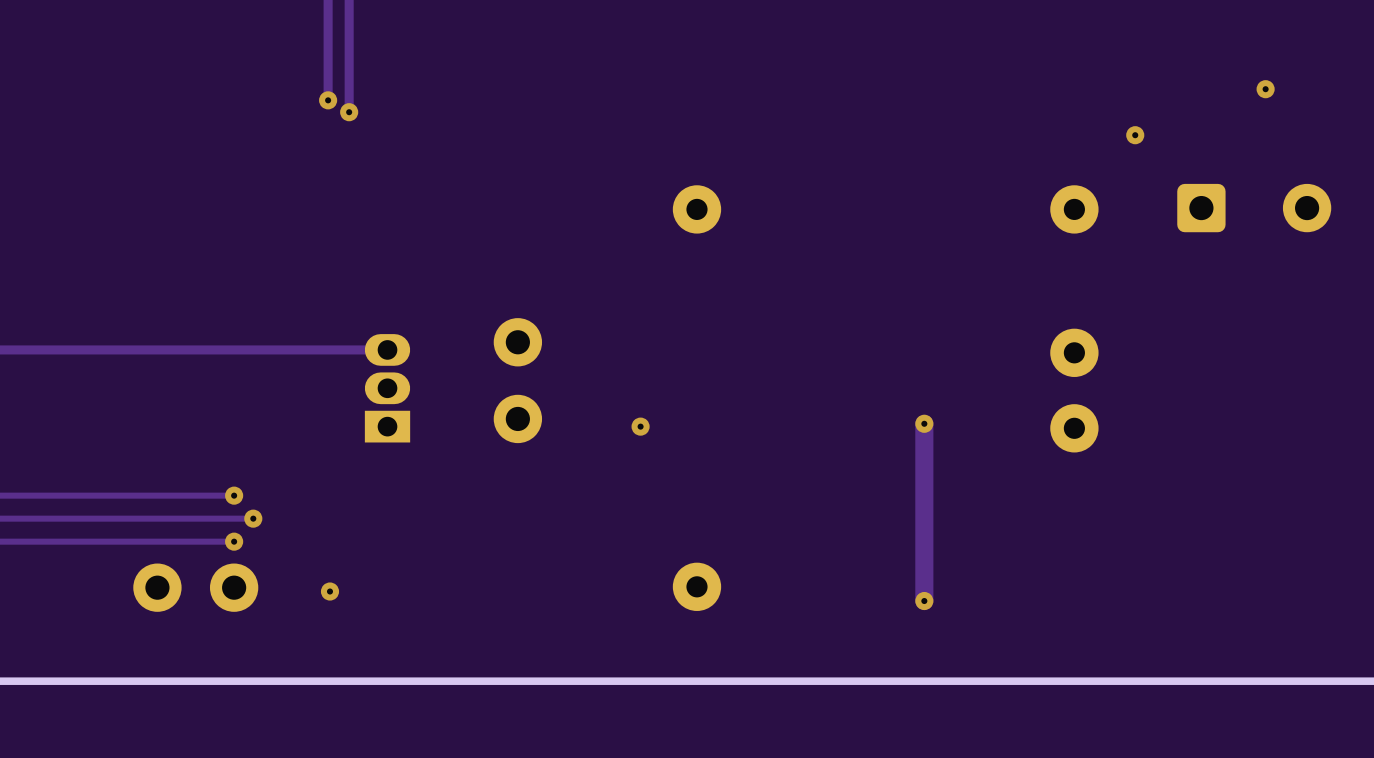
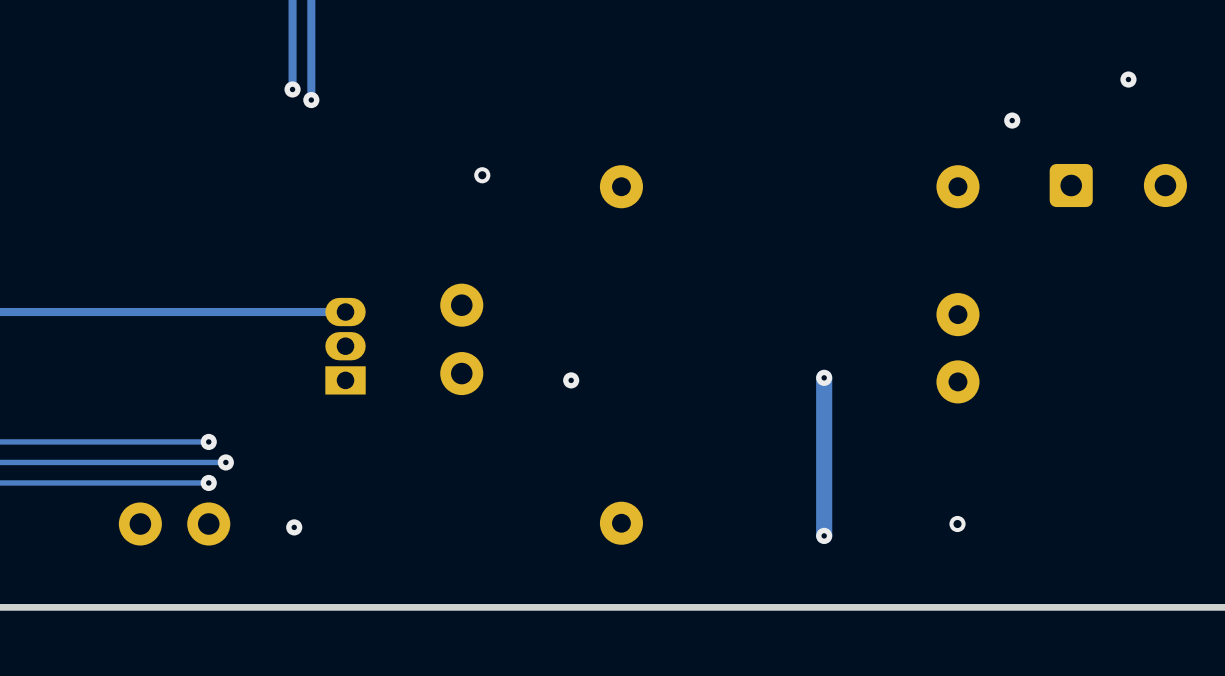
via: none -> (482, 175)
via: none -> (957, 523)

